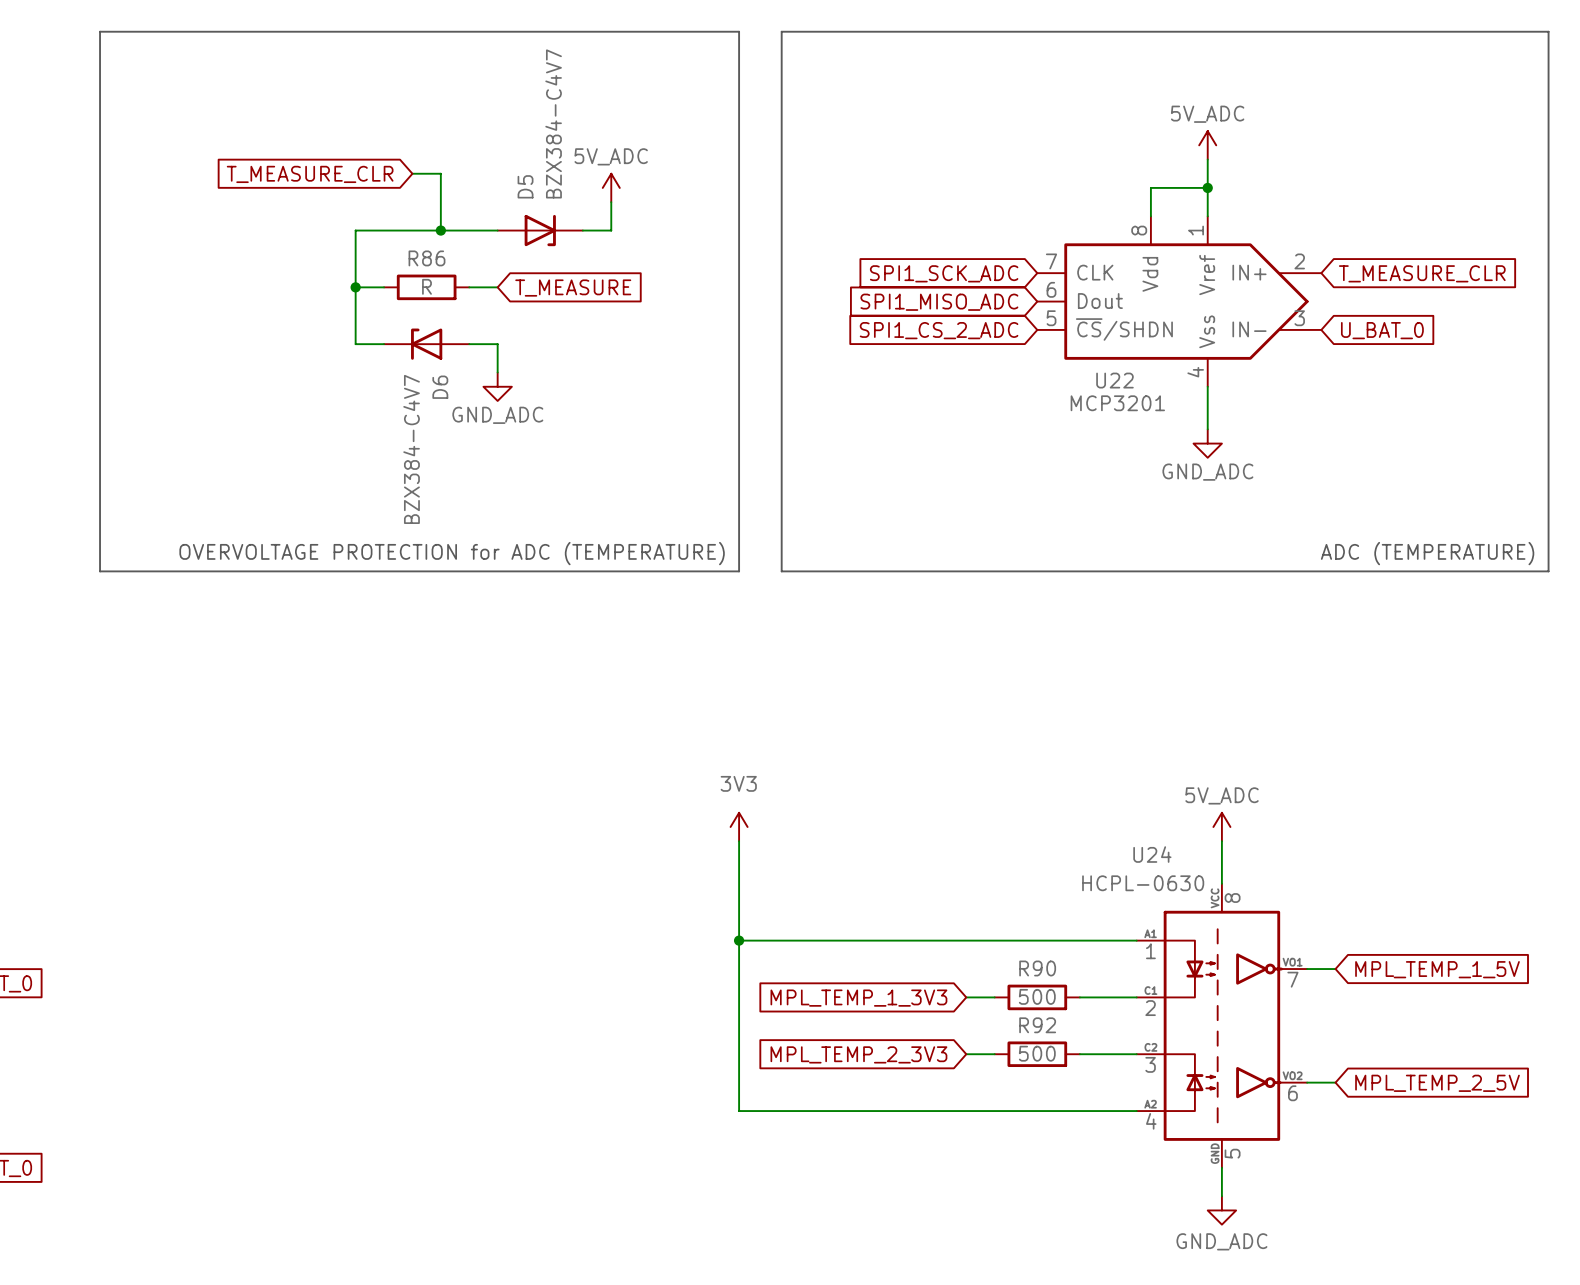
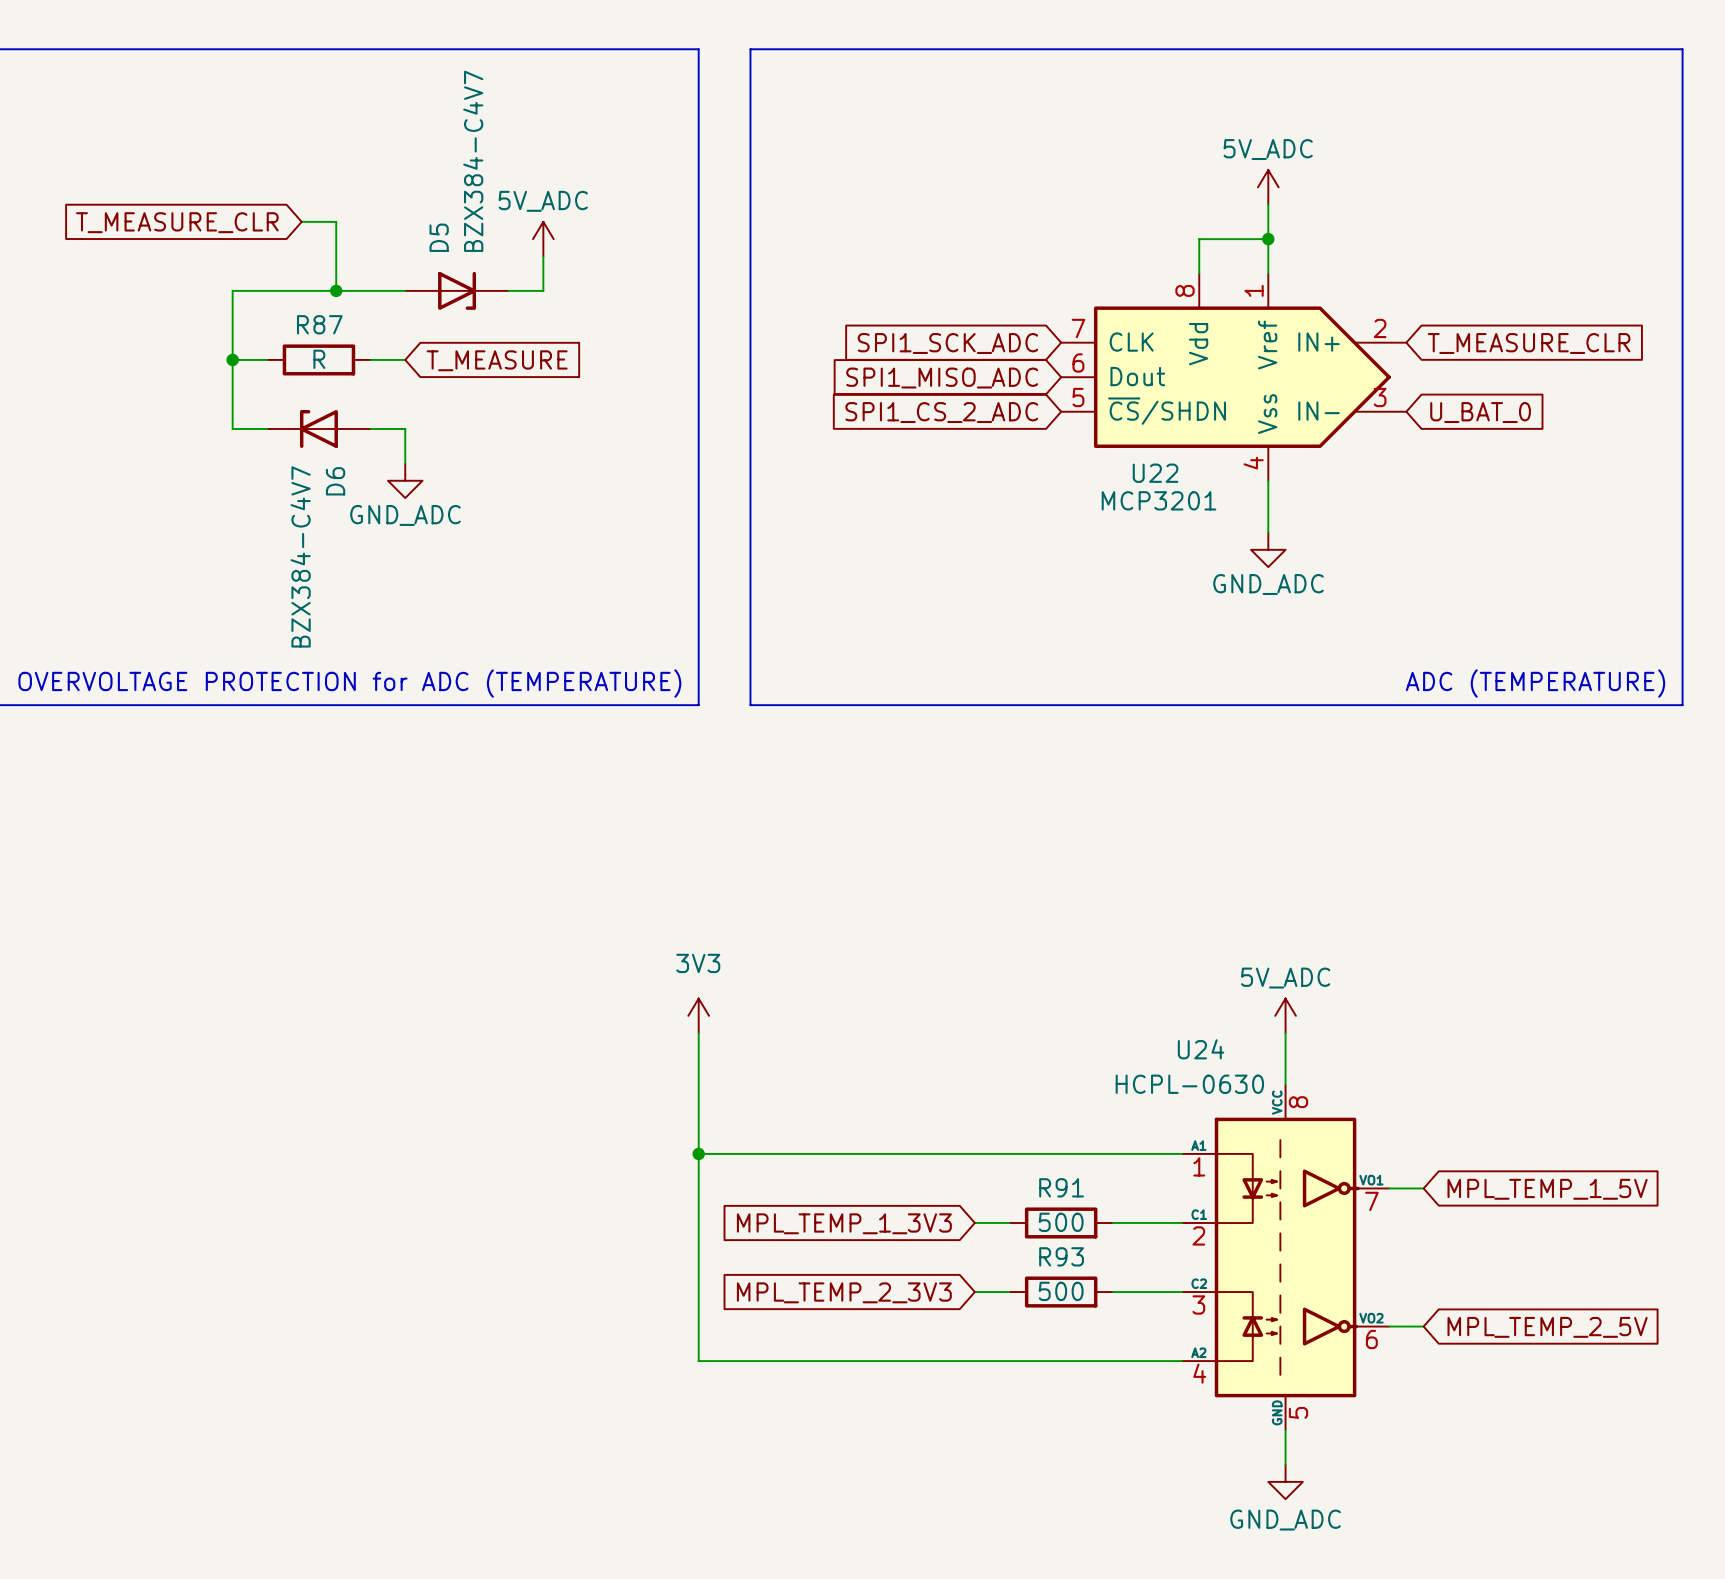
R86 name: R86 (426, 258) -> R87 (319, 324)
R90 name: R90 (1037, 968) -> R91 (1061, 1187)
R92 name: R92 (1037, 1025) -> R93 (1061, 1256)

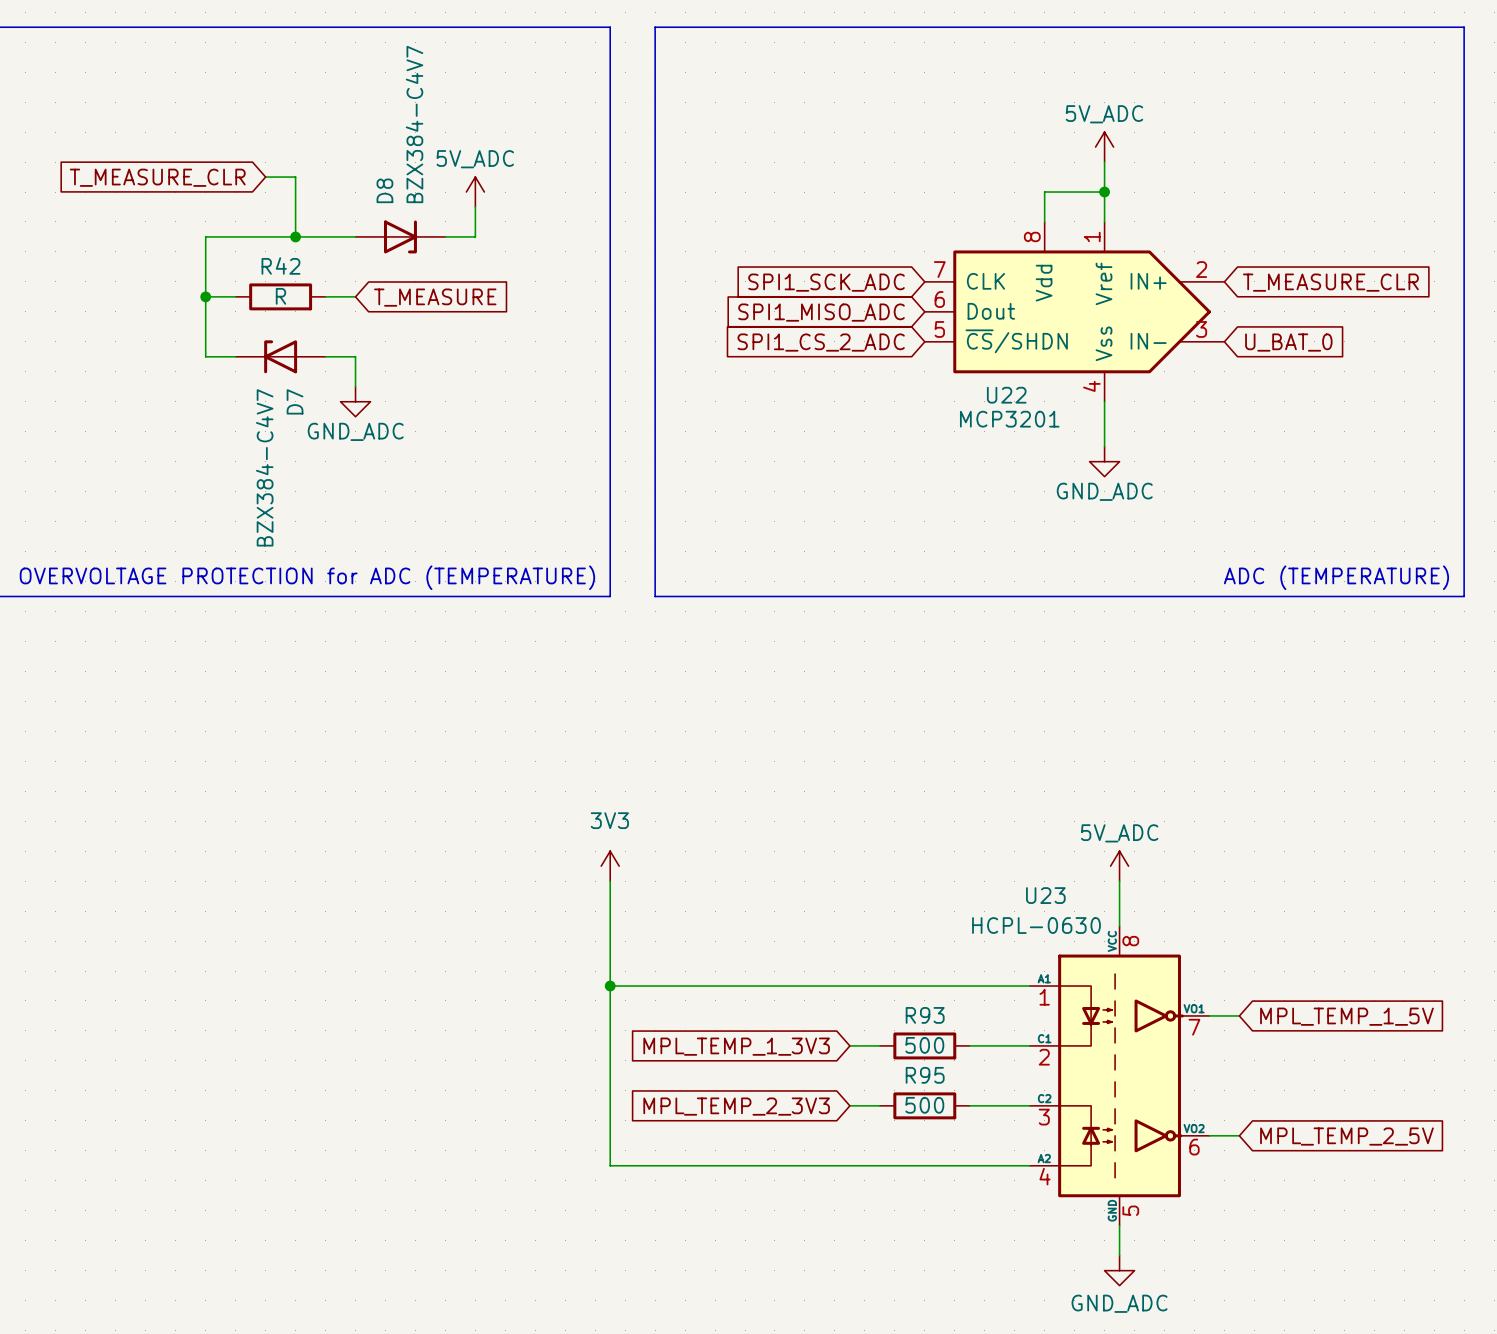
D5 name: D5 (439, 237) -> D8 (384, 190)
R87 name: R87 (319, 324) -> R42 (280, 266)
D6 name: D6 (335, 481) -> D7 (295, 401)
U24 name: U24 (1201, 1049) -> U23 (1045, 895)
R91 name: R91 (1061, 1187) -> R93 (925, 1015)
R93 name: R93 (1061, 1256) -> R95 (925, 1075)

